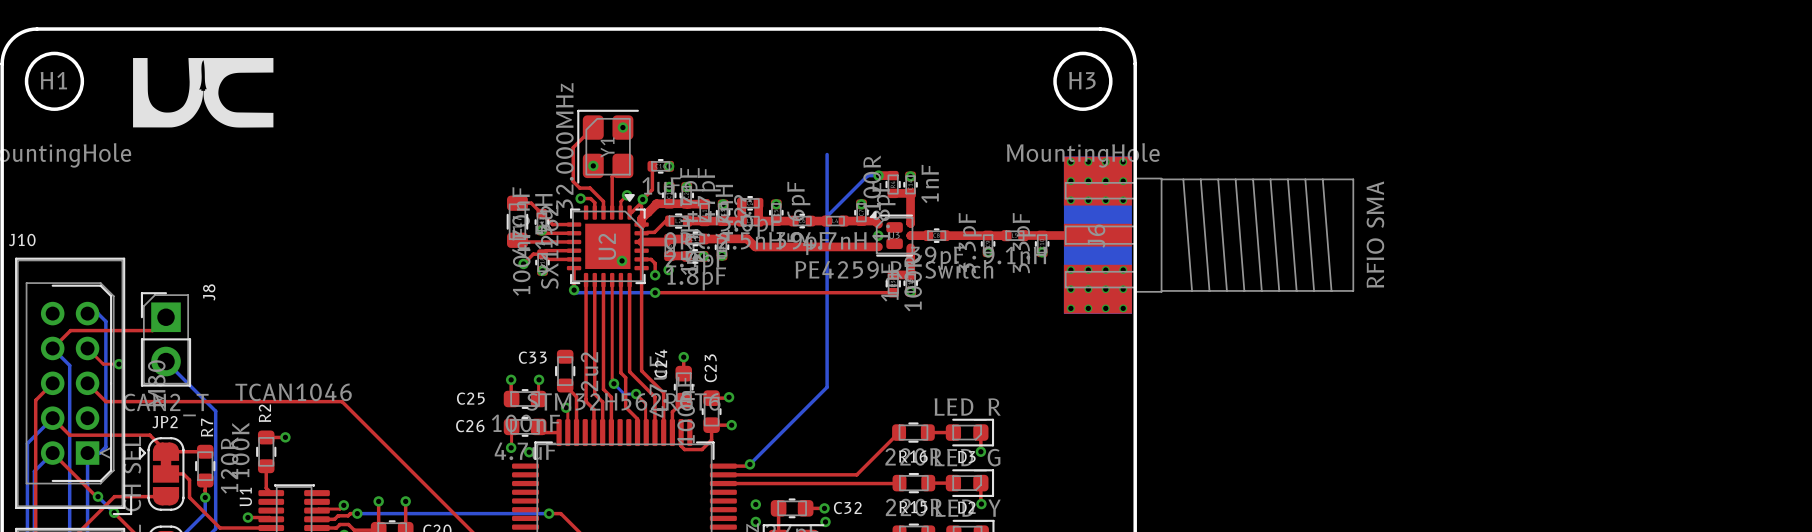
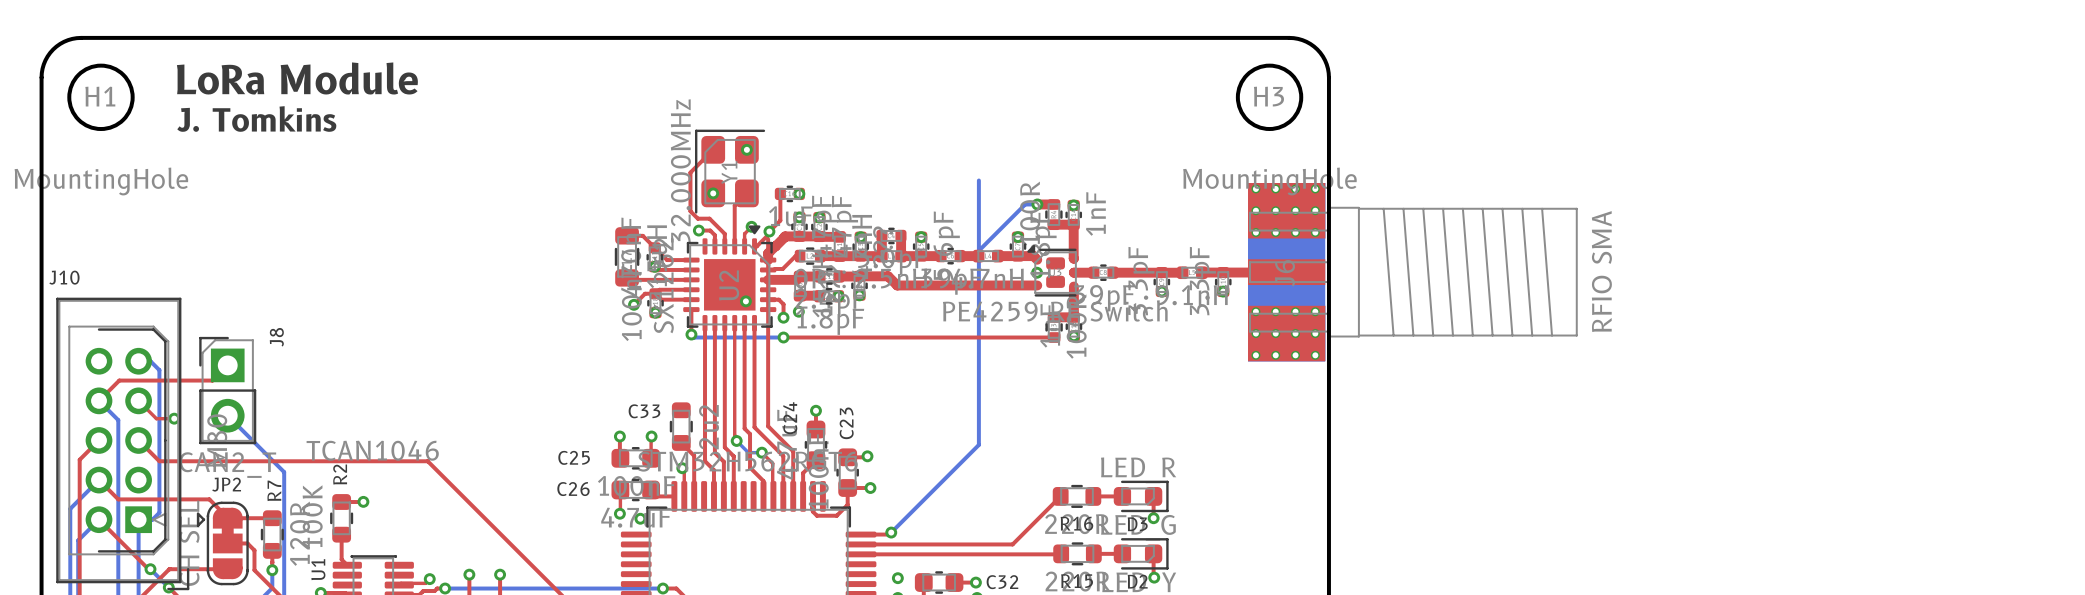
drawing: [133, 58, 274, 128] -> none
text: none -> LoRa Module (297, 78)
text: none -> J. Tomkins (256, 118)

